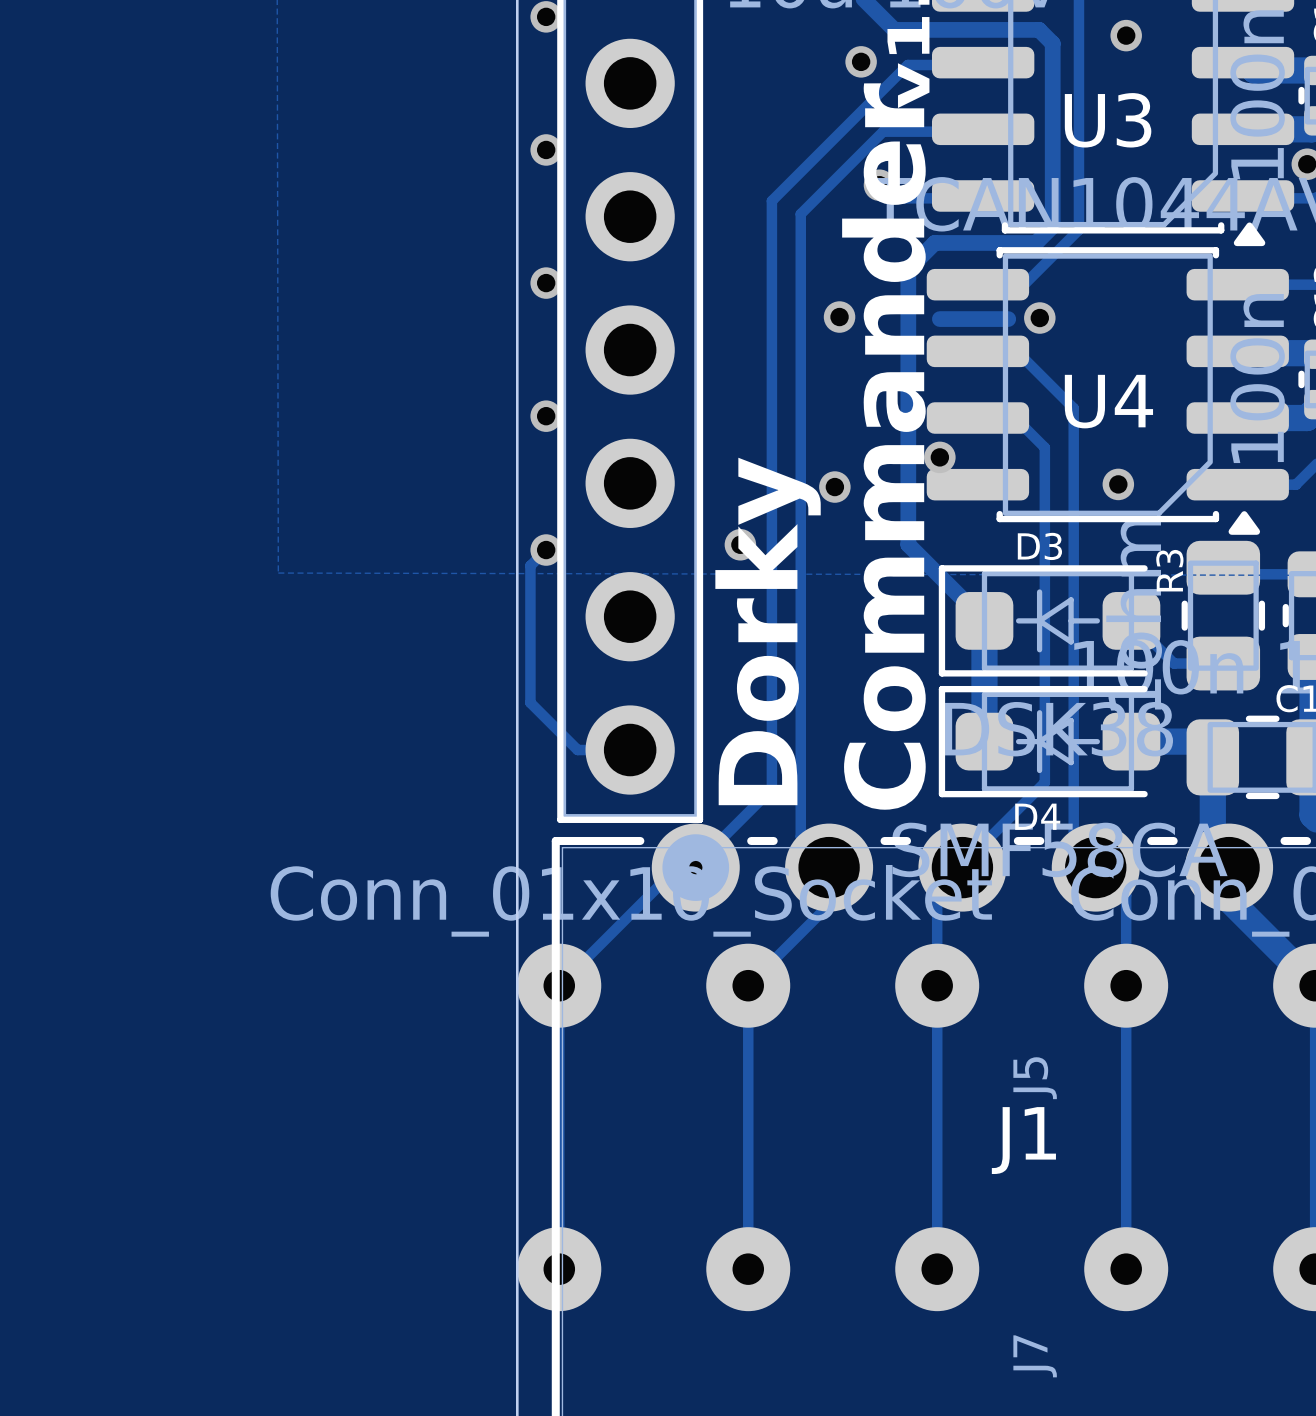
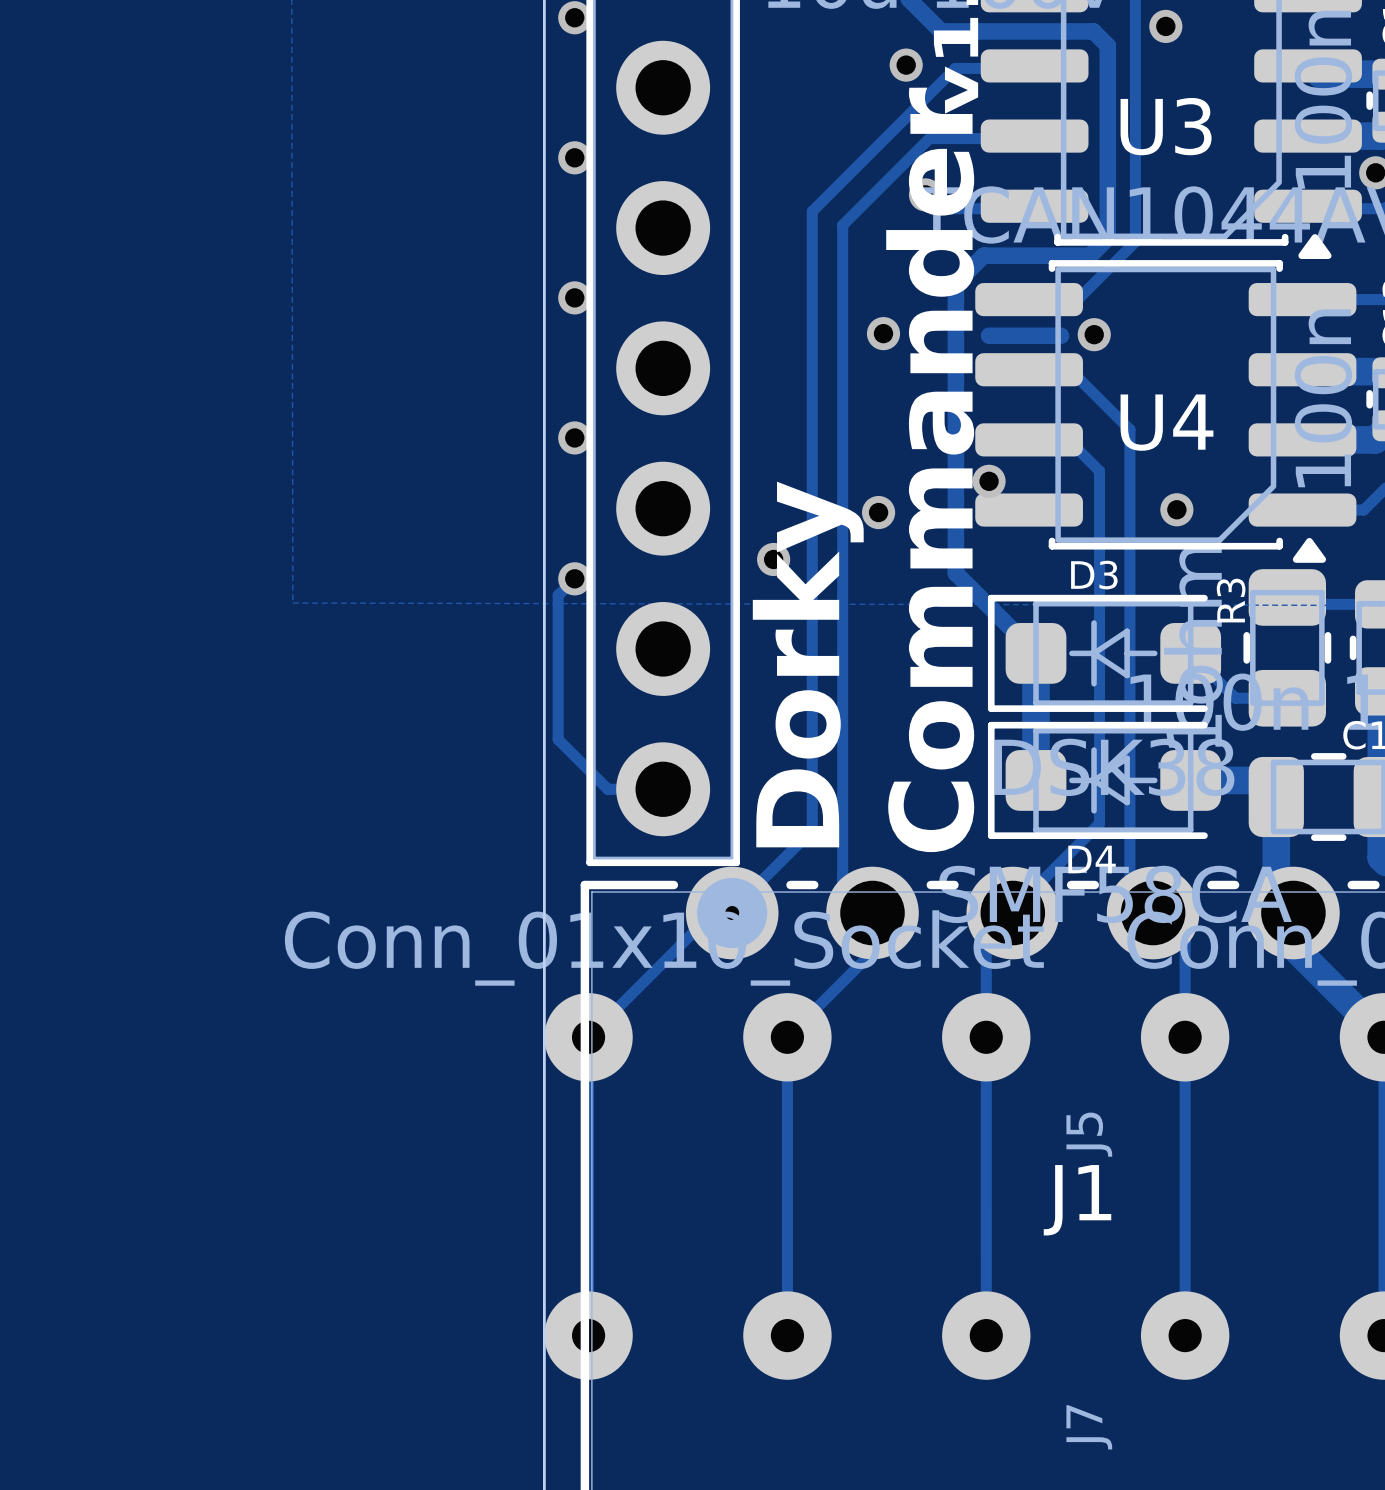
via position: (1126, 35) -> (1165, 26)
via position: (740, 544) -> (773, 559)

